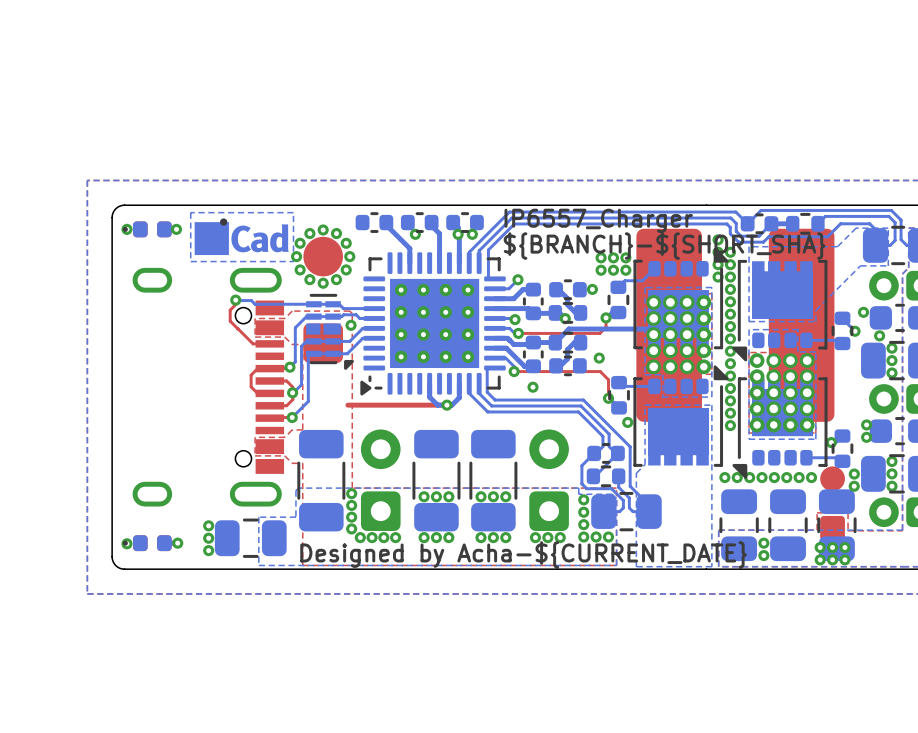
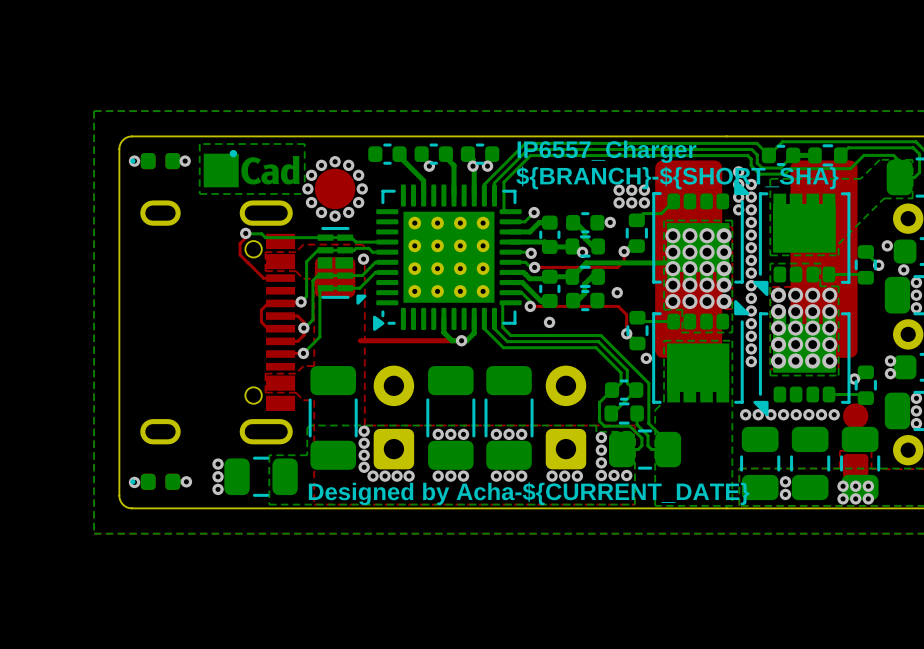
via: (854, 474) -> none
via: (854, 486) -> none

